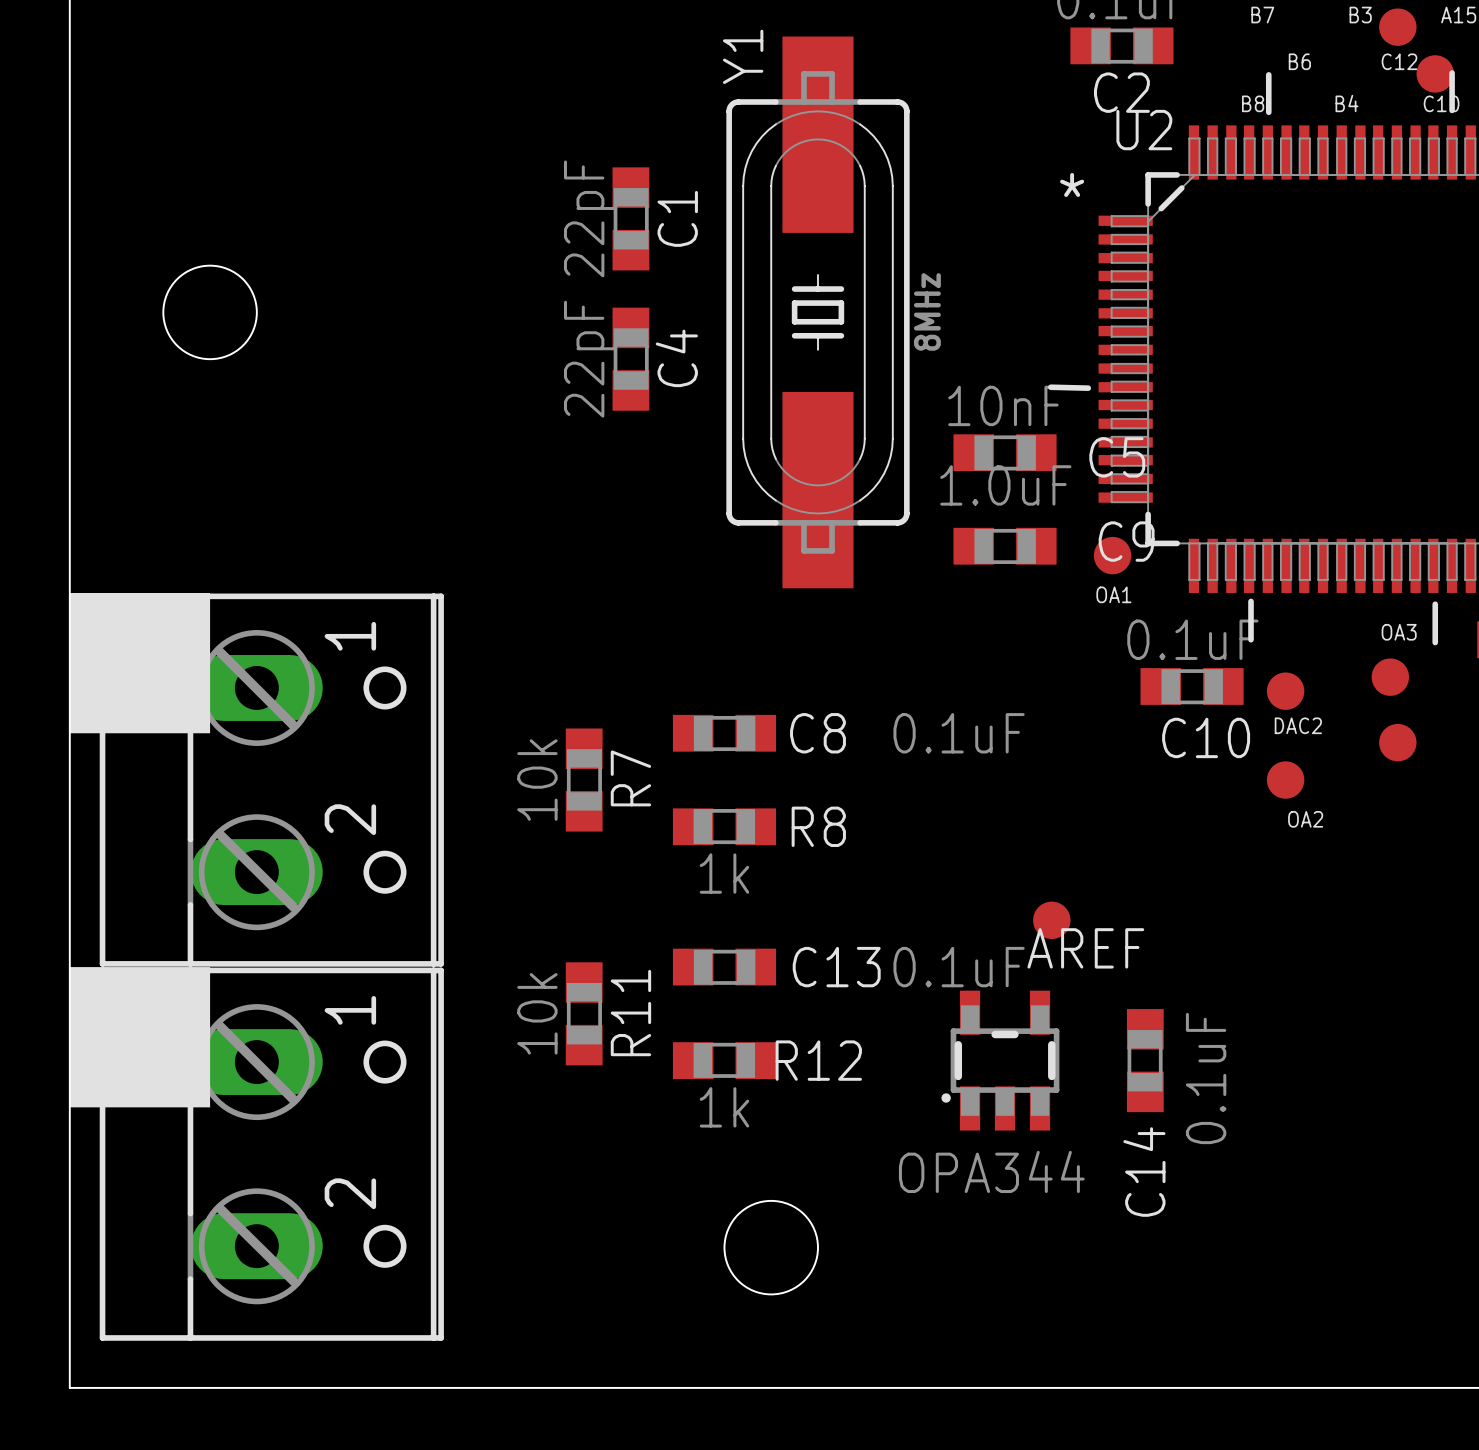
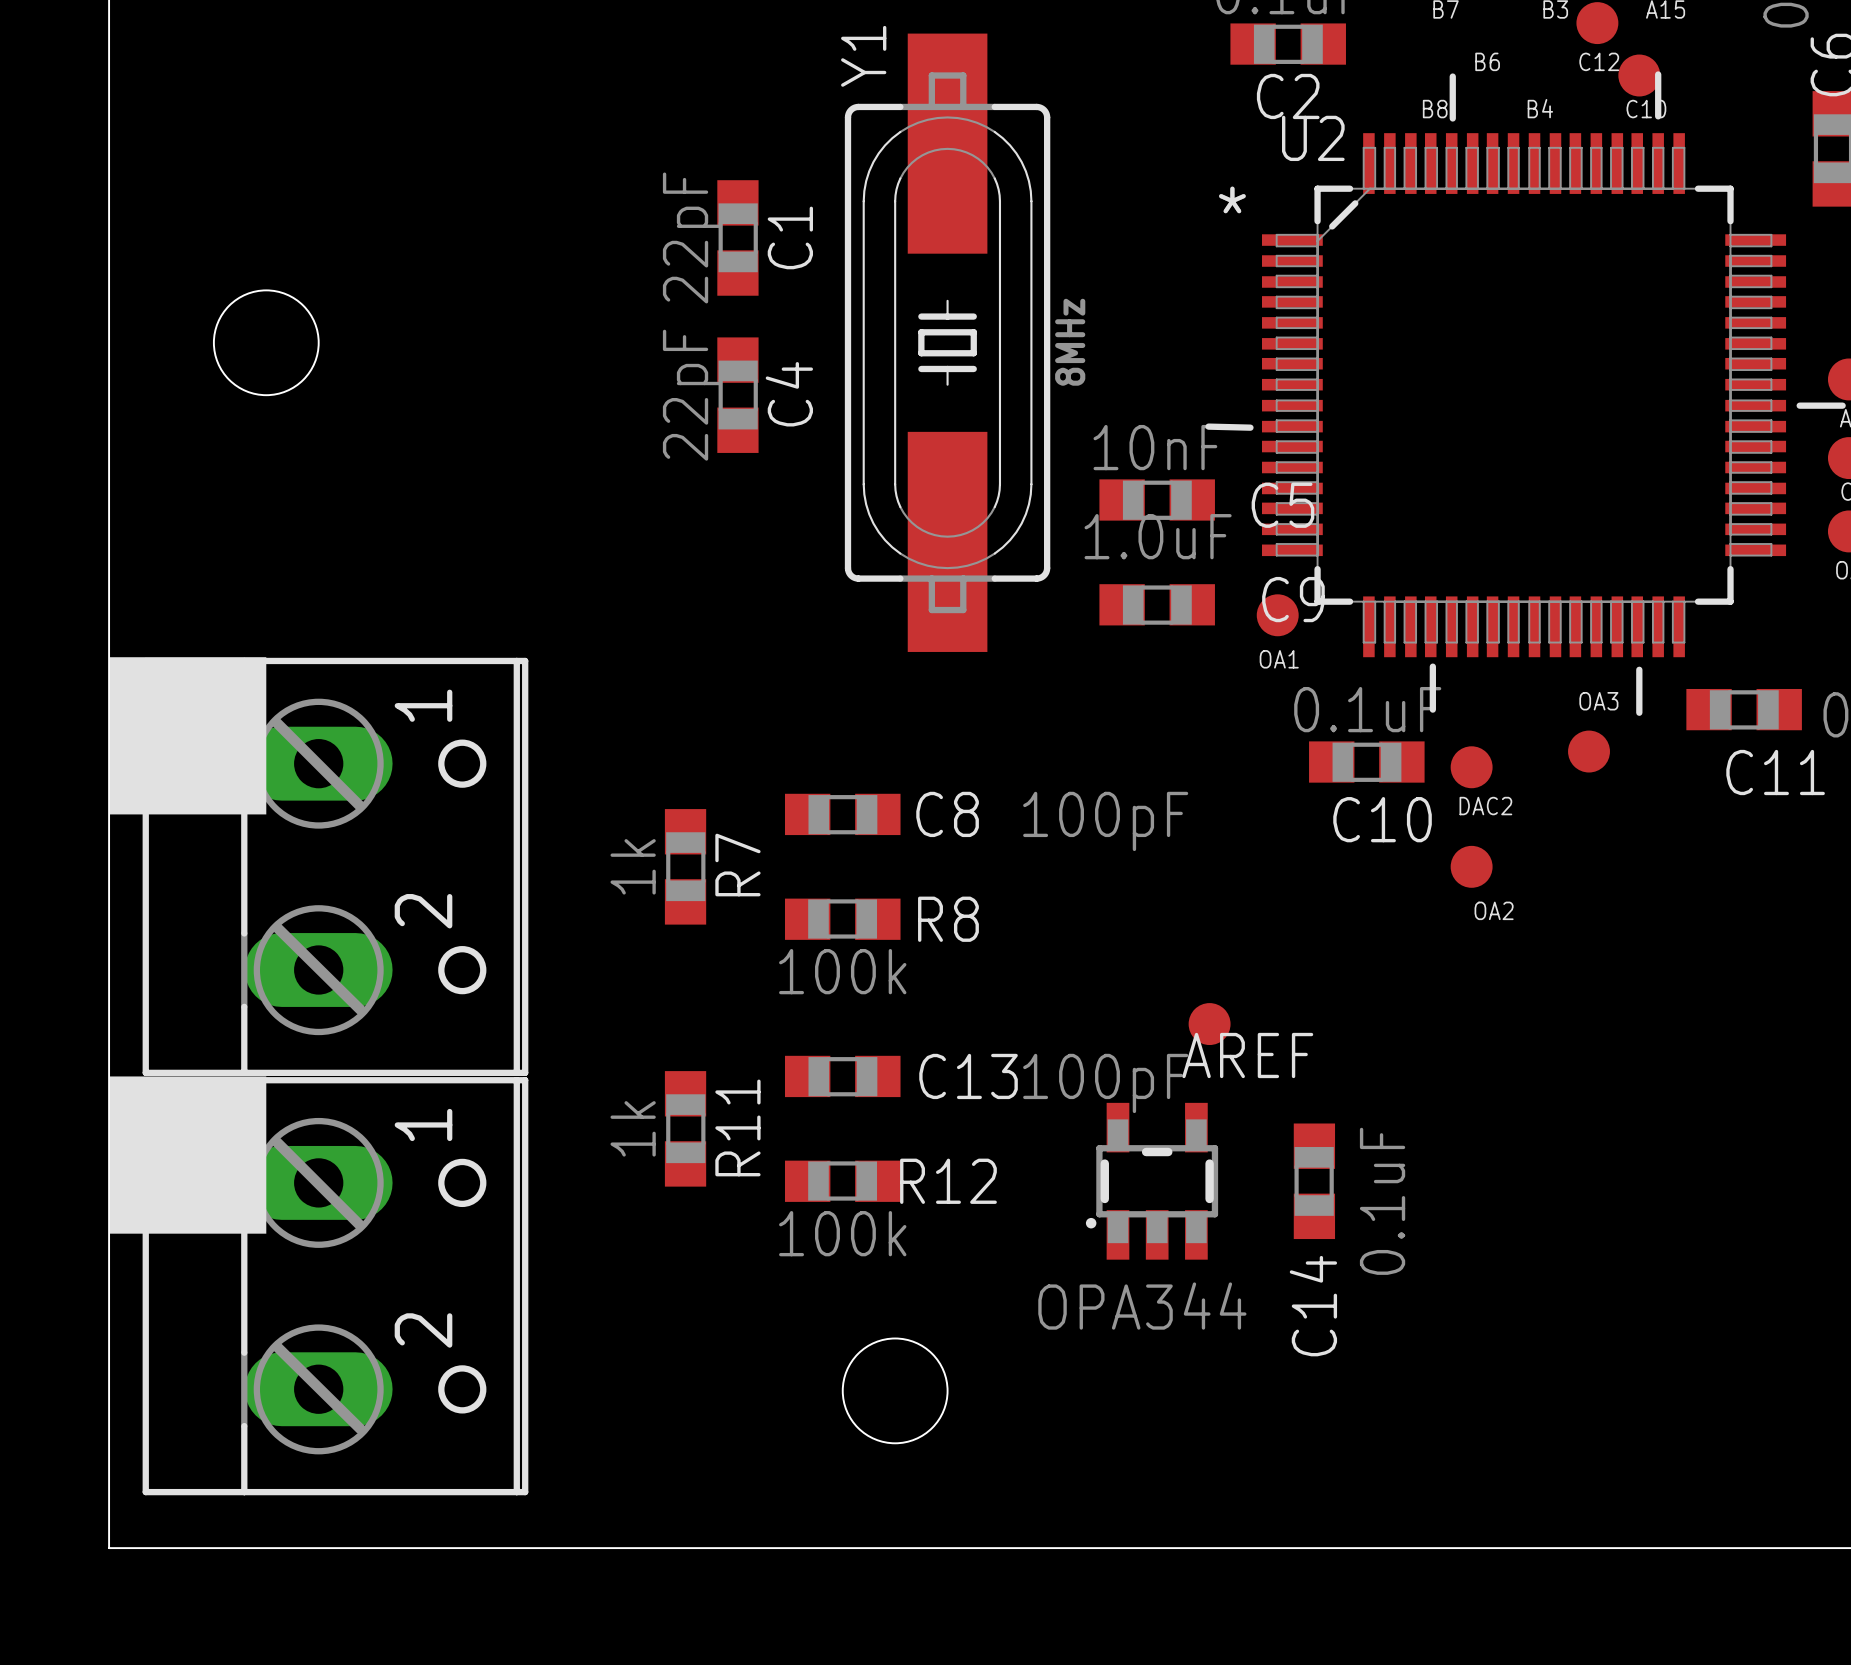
C8 value: 0.1uF (959, 733) -> 100pF (1105, 821)
part: (1397, 742) -> none
R7 value: 10k (537, 780) -> 1k (633, 866)
R8 value: 1k (724, 873) -> 100k (842, 971)
C13 value: 0.1uF (959, 967) -> 100pF (1105, 1083)
R11 value: 10k (537, 1013) -> 1k (633, 1128)
R12 value: 1k (724, 1107) -> 100k (842, 1233)

